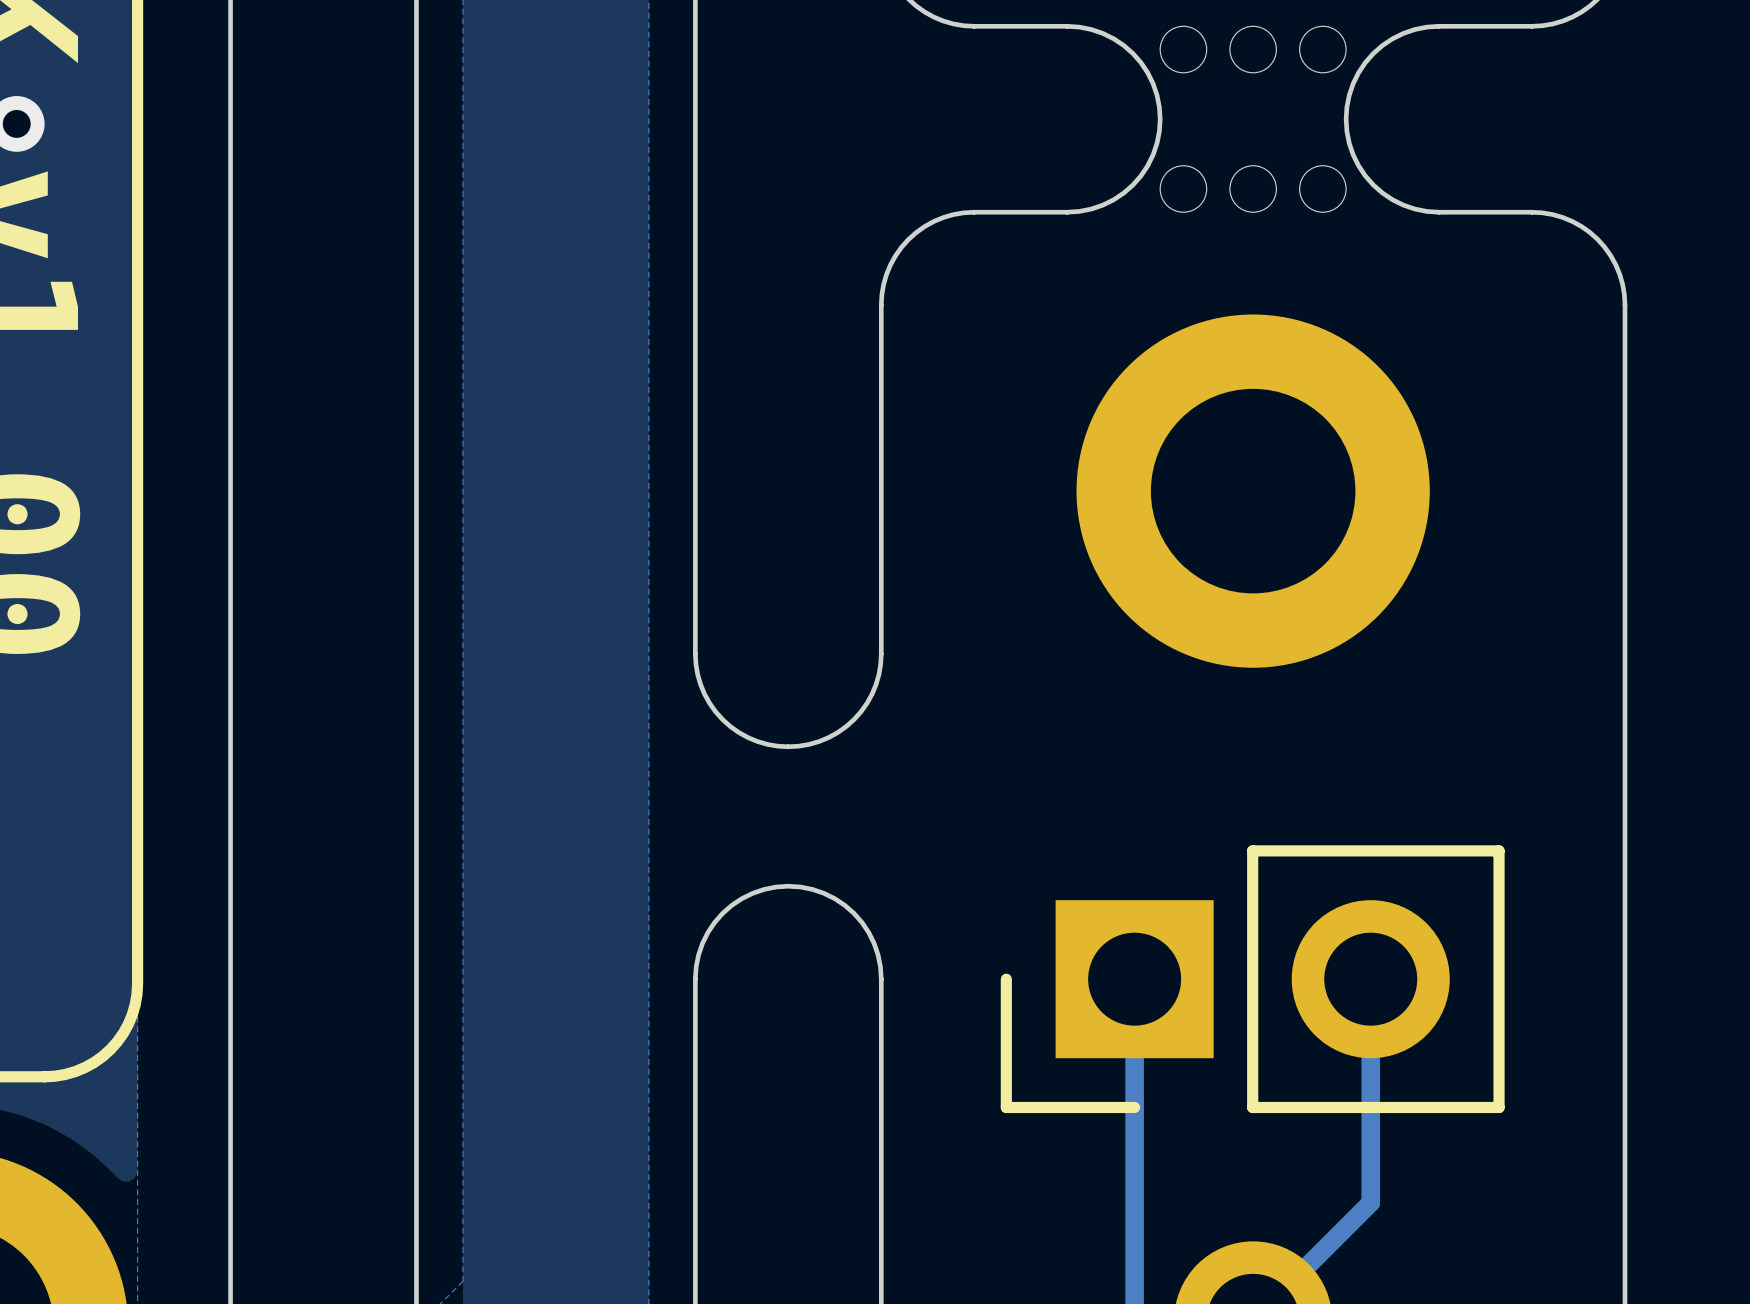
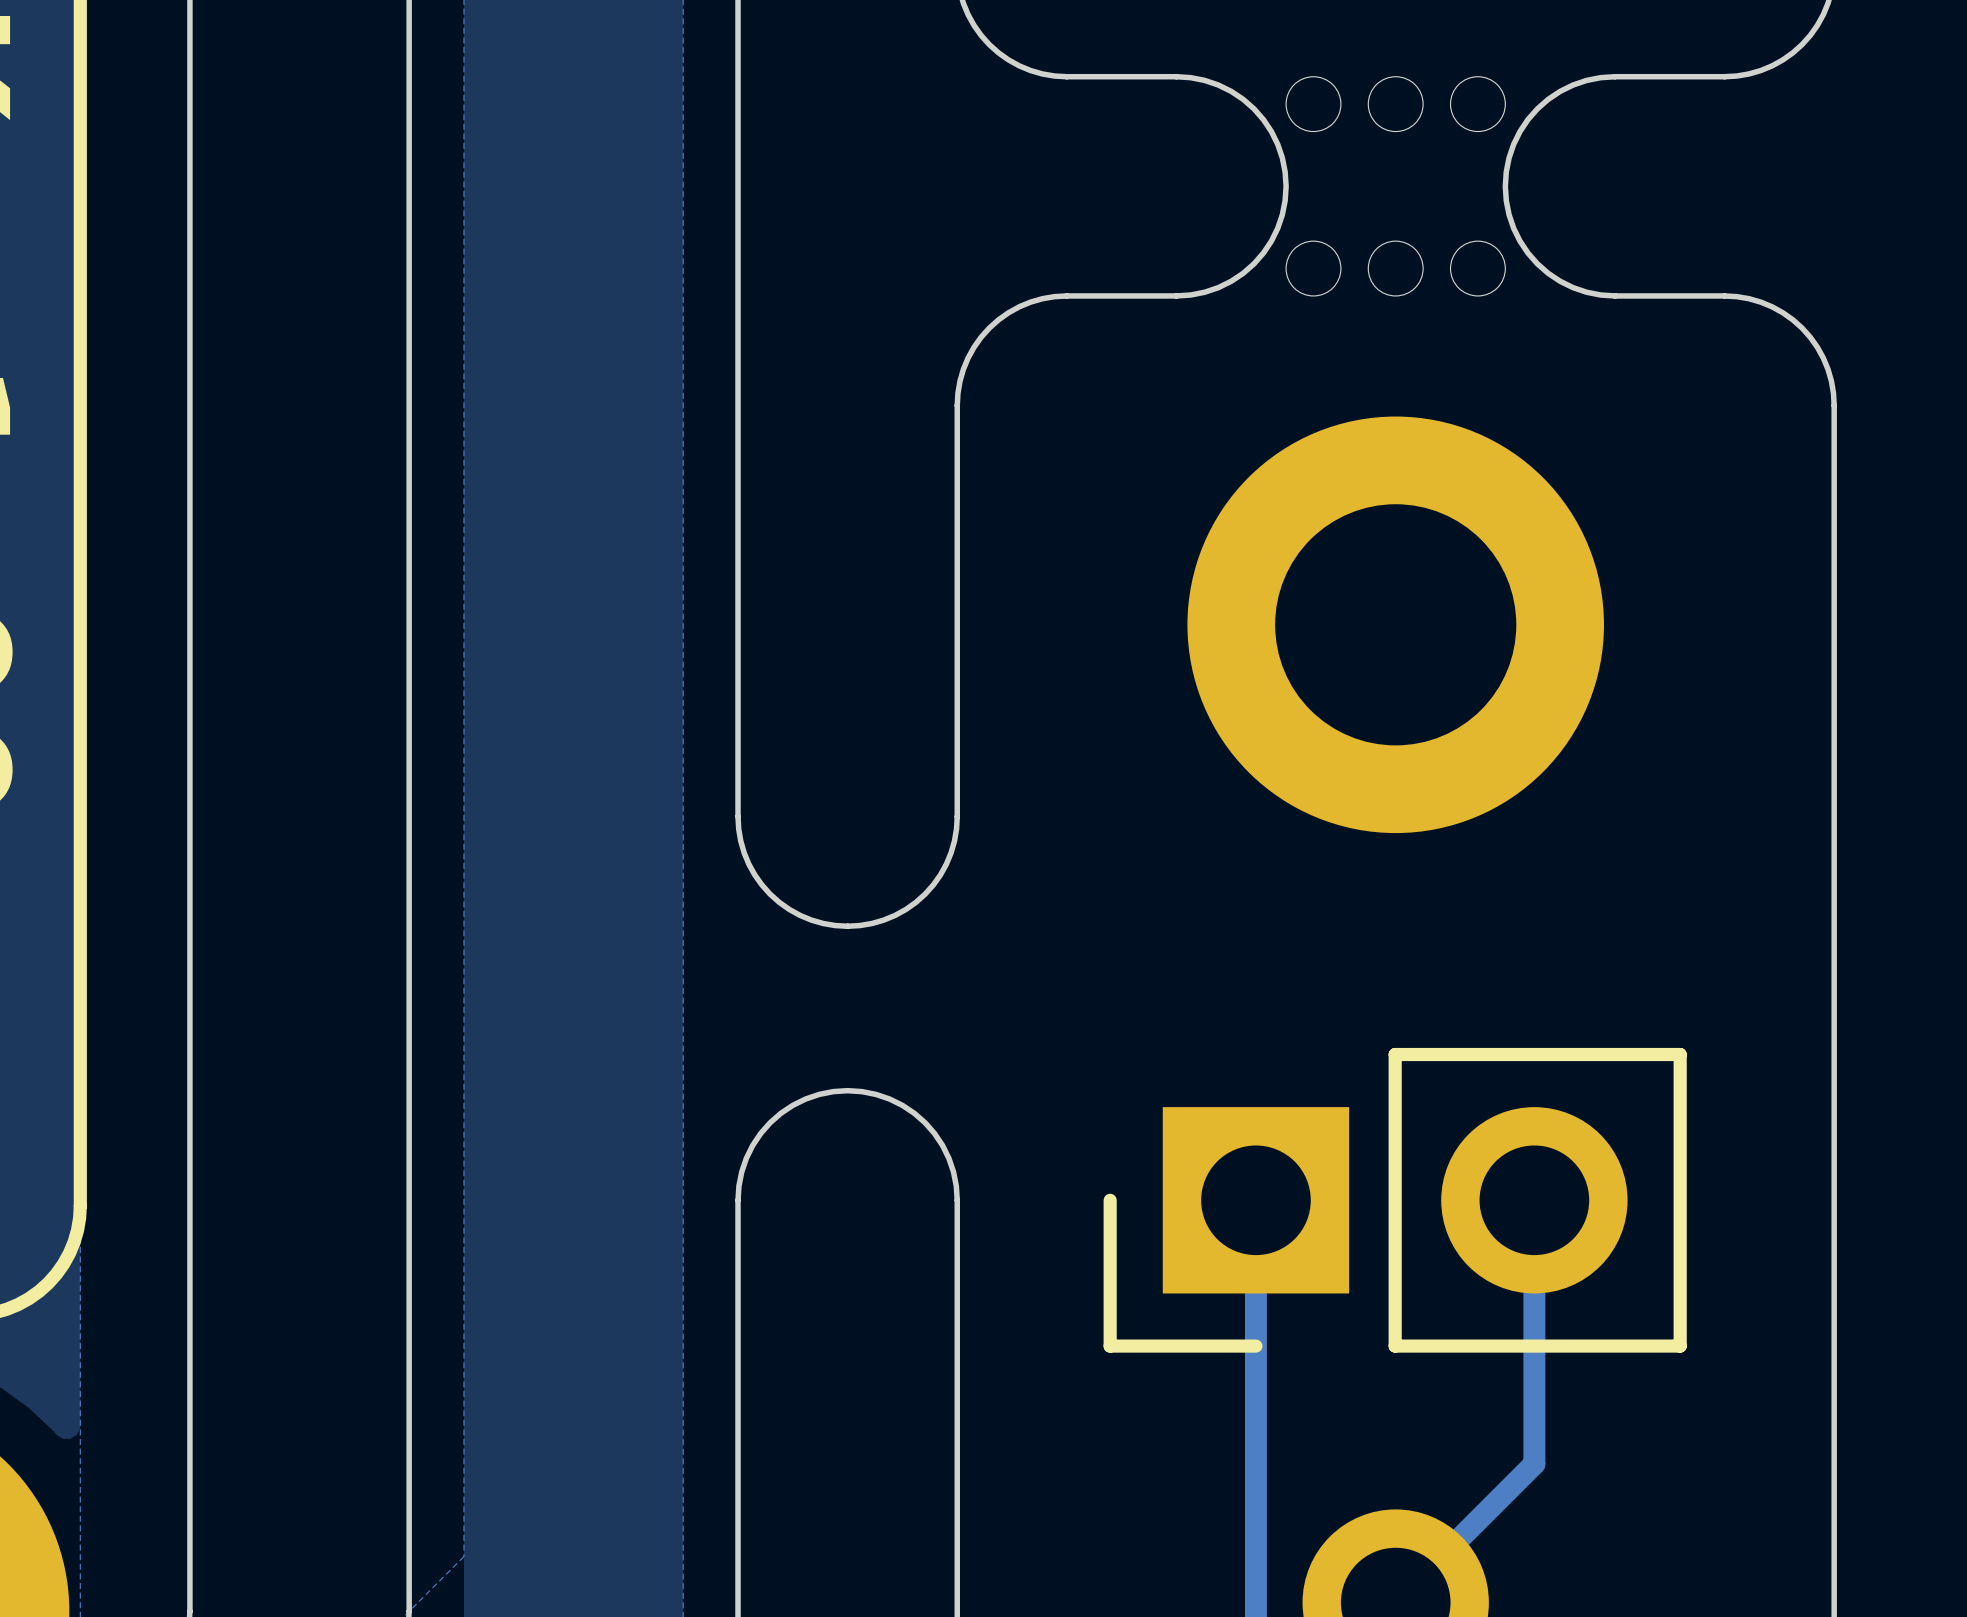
part footprint: [1000, 845, 1505, 1114] -> [1103, 1047, 1687, 1353]

